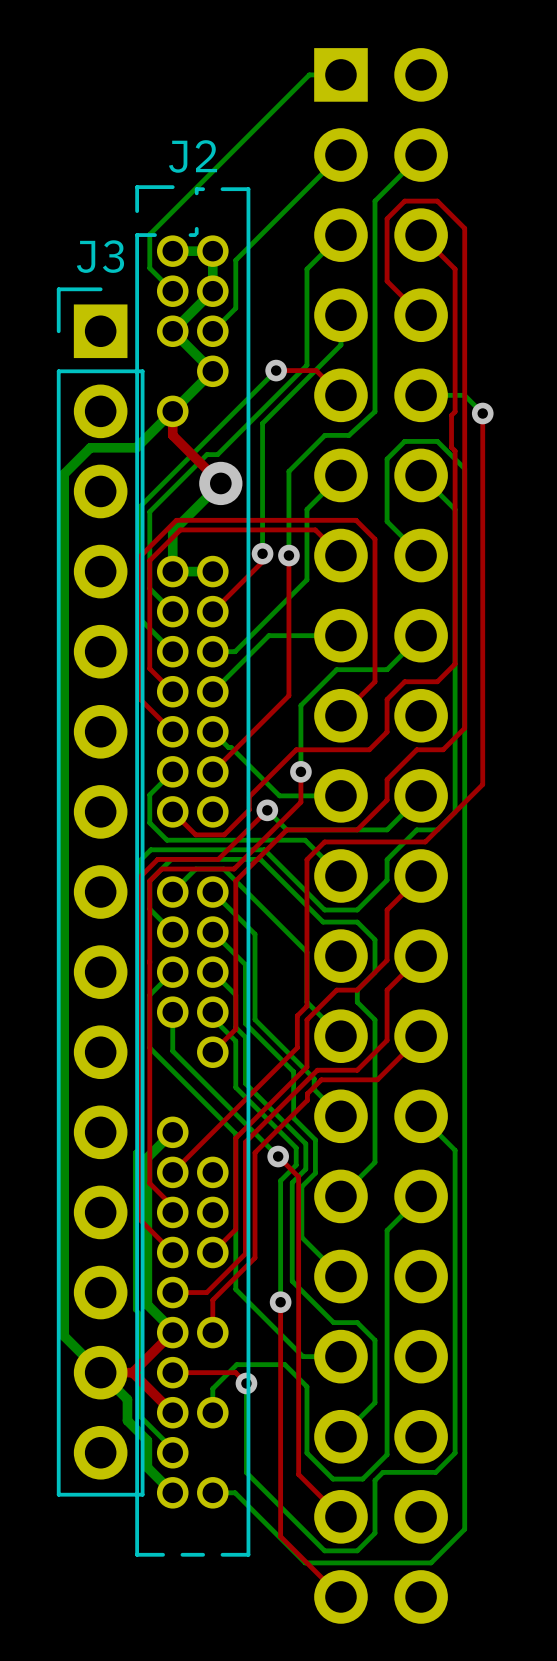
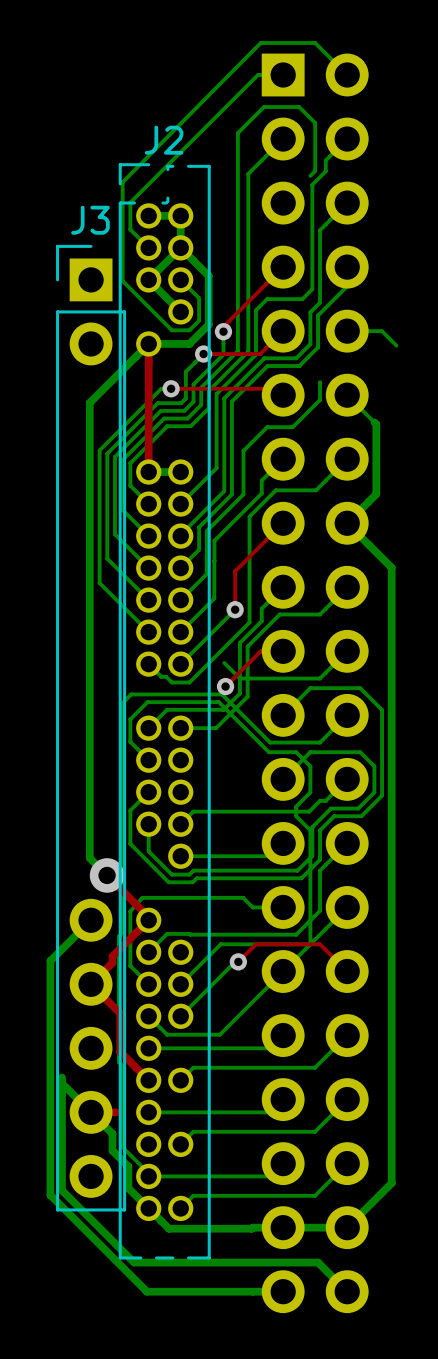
bottom track: (394, 181) (381, 195) -> (325, 160) (325, 171) (312, 184) (312, 289) (302, 299) (267, 299) (255, 310) (255, 354) (216, 394) (216, 468) (180, 504)
bottom track: (297, 198) (235, 260) (235, 308) (212, 331) -> (347, 75) (315, 42) (260, 42) (122, 182) (122, 281) (171, 330) (189, 330) (199, 320) (199, 298) (180, 279)
bottom track: (374, 201) (374, 371) -> (347, 203) (320, 230) (320, 302) (310, 312)
bottom track: (340, 235) (306, 269) (306, 365) (217, 454) (206, 454) (149, 511) (149, 560) -> (248, 173) (248, 351) (208, 390) (208, 408) (190, 426) (167, 426) (130, 463)
top track: (421, 235) (455, 269) (455, 411) (451, 415) (451, 447) (455, 450) (455, 664) (437, 681) (404, 681) (387, 699) (387, 732) (369, 749) (296, 749) (249, 796) (249, 809) (224, 834) (195, 834) (172, 811) -> none
J3 footprint: [56, 287, 145, 1497] -> [56, 244, 127, 1212]
top track: none -> (283, 267) (223, 326) (223, 331)
bottom track: (340, 315) (340, 344) (262, 423) (262, 553) -> none
top track: (421, 315) (387, 281) (387, 218) (404, 201) (437, 201) (464, 228) (464, 728) (443, 749) (416, 749) (387, 779) (387, 800) (357, 829) (286, 829) (235, 880) (235, 1029) (212, 1052) -> none
top track: (276, 370) (316, 370) (340, 395) -> (203, 354) (260, 354) (283, 331)
bottom track: (276, 370) (140, 506) (140, 556) -> (315, 171) (315, 123) (299, 107) (263, 107) (237, 133) (237, 351) (201, 387) (201, 404) (187, 418) (164, 418) (122, 460)
via position: (276, 370) -> (223, 331)
bottom track: (212, 371) (172, 411) -> (180, 247) (208, 275) (208, 324) (189, 343) (148, 343)
bottom track: none -> (223, 331) (223, 354) (193, 384) (193, 401) (184, 410) (160, 410) (114, 456) (114, 534) (148, 568)
bottom track: (374, 411) (348, 435) (324, 435) (321, 438) -> (347, 267) (347, 286) (318, 315) (318, 347) (299, 366) (267, 366)
top track: (482, 413) (482, 784) (425, 841) (324, 841) (306, 859) (306, 1006) (297, 1015) (297, 1047) (172, 1172) -> none
via: (482, 413) -> none
bottom track: none -> (203, 354) (185, 371) (185, 398) (181, 403) (157, 403) (107, 453) (107, 558) (148, 600)
via: none -> (203, 354)
top track: (172, 435) (220, 483) -> (148, 363) (148, 472)
bottom track: (136, 447) (90, 447) (64, 473) (64, 1328) -> (119, 373) (89, 402) (89, 858) (107, 875)
bottom track: (387, 459) (404, 441) (437, 441) (464, 468) (464, 869) -> none
via size: [199, 461, 243, 506] -> [162, 380, 180, 398]
top track: none -> (171, 388) (276, 388) (283, 395)
bottom track: none -> (171, 388) (161, 388) (99, 450) (99, 583) (148, 632)
bottom track: (288, 471) (288, 555) -> (241, 391) (231, 401) (231, 494) (199, 527) (199, 549)
bottom track: (340, 475) (306, 509) (306, 579) (235, 651) (212, 651) -> (310, 344) (296, 358) (264, 358) (224, 398) (224, 491) (180, 536)
bottom track: (387, 481) (387, 521) (421, 555) -> (320, 399) (292, 427) (267, 427) (243, 450) (243, 494) (206, 531) (206, 557)
bottom track: (220, 483) (172, 531) (172, 571) -> none
bottom track: (455, 509) (455, 812) (437, 829) (416, 829) (387, 859) (387, 880) (357, 910) -> (347, 715) (320, 742) (296, 742)
bottom track: none -> (374, 422) (376, 424) (376, 494) (347, 523) (391, 567) (391, 1183) (347, 1227) (169, 1228) (148, 1208)
top track: (262, 553) (262, 561) (212, 611) -> none
via: (262, 553) -> none
top track: (288, 555) (288, 695) (212, 771) -> none
via: (288, 555) -> none
top track: (340, 555) (315, 529) (180, 529) (149, 560) (149, 668) (172, 691) -> none
bottom track: none -> (283, 459) (261, 480) (261, 493) (214, 540) (214, 598) (180, 632)
bottom track: none -> (347, 459) (316, 490) (275, 490) (249, 516) (249, 622) (189, 682) (171, 682) (166, 676) (161, 676) (148, 664)
top track: none -> (283, 523) (235, 571) (235, 609)
bottom track: (340, 635) (268, 635) (235, 668) -> none
bottom track: (421, 635) (387, 669) (336, 669) (300, 705) (300, 771) -> none
top track: (340, 715) (374, 681) (374, 539) (356, 520) (176, 520) (140, 556) (140, 699) (172, 731) -> none
bottom track: none -> (283, 587) (261, 608) (261, 621) (239, 642) (239, 693) (223, 709) (189, 709)
bottom track: none -> (347, 587) (320, 614) (279, 614) (247, 646) (247, 696) (216, 728) (180, 728)
bottom track: (212, 731) (279, 795) (340, 795) -> (180, 600) (206, 574) (206, 557)
bottom track: none -> (235, 609) (180, 664)
via: none -> (235, 609)
bottom track: (172, 771) (149, 794) (149, 822) (167, 840) (305, 840) (340, 875) -> (382, 709) (360, 688) (310, 688) (283, 715)
top track: (300, 771) (300, 802) (234, 869) (161, 869) (149, 880) (149, 1183) (172, 1206) (172, 1212) -> none
via: (300, 771) -> none
top track: none -> (283, 651) (260, 651) (225, 686)
top track: (267, 810) (218, 859) (157, 859) (139, 878) (139, 1218) (172, 1252) -> none
via position: (267, 810) -> (225, 686)
bottom track: (223, 869) (306, 952) (306, 1002) (340, 1036) -> (180, 856) (270, 856) (283, 843)
top track: (421, 875) (387, 910) (387, 960) (357, 990) (336, 990) (306, 1019) (306, 1067) (235, 1138) (235, 1229) (212, 1252) -> none
bottom track: (212, 892) (255, 934) (255, 1019) (314, 1078) (314, 1089) (340, 1116) -> (148, 984) (130, 965) (130, 911) (142, 897) (243, 897) (252, 907) (283, 907)
bottom track: (212, 932) (245, 964) (245, 1023) (293, 1071) (293, 1118) (315, 1139) (315, 1173) (301, 1186) (301, 1237) (340, 1276) -> (148, 1048) (270, 1048) (283, 1035)
top track: (421, 956) (387, 990) (387, 1040) (357, 1070) (317, 1070) (245, 1142) (245, 1253) (206, 1292) (172, 1292) -> none
bottom track: (212, 972) (235, 995) (235, 1027) (245, 1037) (245, 1083) (305, 1143) (305, 1169) (292, 1182) (292, 1281) (333, 1322) (357, 1322) (374, 1340) (374, 1402) (340, 1436) -> (148, 1176) (270, 1176) (283, 1163)
bottom track: (464, 976) (464, 1529) (431, 1562) (305, 1562) (235, 1492) (212, 1492) -> (382, 795) (361, 816) (334, 816) (320, 830) (320, 859) (301, 878) (196, 878) (192, 882) (168, 882) (130, 843)
bottom track: (212, 1012) (212, 1018) (235, 1041) (235, 1087) (296, 1147) (296, 1165) (280, 1180) (280, 1302) -> (180, 824) (193, 811) (309, 811) (320, 800) (325, 800) (347, 779)
bottom track: (149, 1036) (149, 1047) (235, 1133) (235, 1289) (303, 1356) (340, 1356) -> (148, 1112) (270, 1112) (283, 1099)
top track: (421, 1036) (377, 1079) (321, 1079) (307, 1093) (307, 1100) (255, 1152) (255, 1257) (212, 1300) (212, 1332) -> none
bottom track: none -> (347, 843) (320, 870) (320, 910) (296, 934) (167, 933) (148, 952)
bottom track: (172, 1046) (172, 1051) (278, 1156) -> (148, 851) (171, 874) (189, 874) (193, 870) (297, 870) (312, 855) (312, 827) (330, 808) (358, 808) (374, 792) (374, 766) (360, 752) (310, 752) (283, 779)
via: none -> (107, 875)
bottom track: (421, 1116) (455, 1150) (455, 1453) (435, 1472) (383, 1472) (374, 1480) (374, 1533) (357, 1550) (324, 1550) (246, 1472) (246, 1383) -> (347, 907) (310, 944) (220, 944) (180, 984)
bottom track: none -> (91, 920) (50, 960) (50, 1195) (146, 1291) (283, 1291)
bottom track: (172, 1132) (147, 1157) (147, 1304) (172, 1330) (172, 1332) -> none
top track: (278, 1156) (298, 1177) (298, 1474) (340, 1516) -> none
via position: (278, 1156) -> (238, 961)
top track: none -> (238, 961) (255, 944) (320, 944) (347, 971)
bottom track: none -> (238, 961) (235, 961) (180, 1016)
bottom track: none -> (283, 971) (219, 1034) (167, 1034) (148, 1016)
bottom track: (421, 1196) (387, 1230) (387, 1454) (362, 1479) (332, 1479) (306, 1453) (306, 1386) (284, 1364) (236, 1364) (212, 1388) (212, 1412) -> (347, 1099) (315, 1131) (193, 1131) (180, 1144)
bottom track: none -> (347, 1035) (315, 1067) (193, 1067) (180, 1080)
top track: (280, 1302) (280, 1536) (340, 1596) -> none
via: (280, 1302) -> none
top track: (172, 1332) (132, 1372) (172, 1412) -> (148, 1080) (120, 1051) (120, 1013) (91, 984) (112, 962) (112, 956) (148, 920) (148, 917) (107, 875)
bottom track: none -> (61, 1083) (61, 1190) (134, 1262) (318, 1262) (347, 1291)
top track: (172, 1372) (235, 1372) (246, 1383) -> none
via: (246, 1383) -> none
bottom track: none -> (347, 1163) (315, 1195) (193, 1195) (180, 1208)

